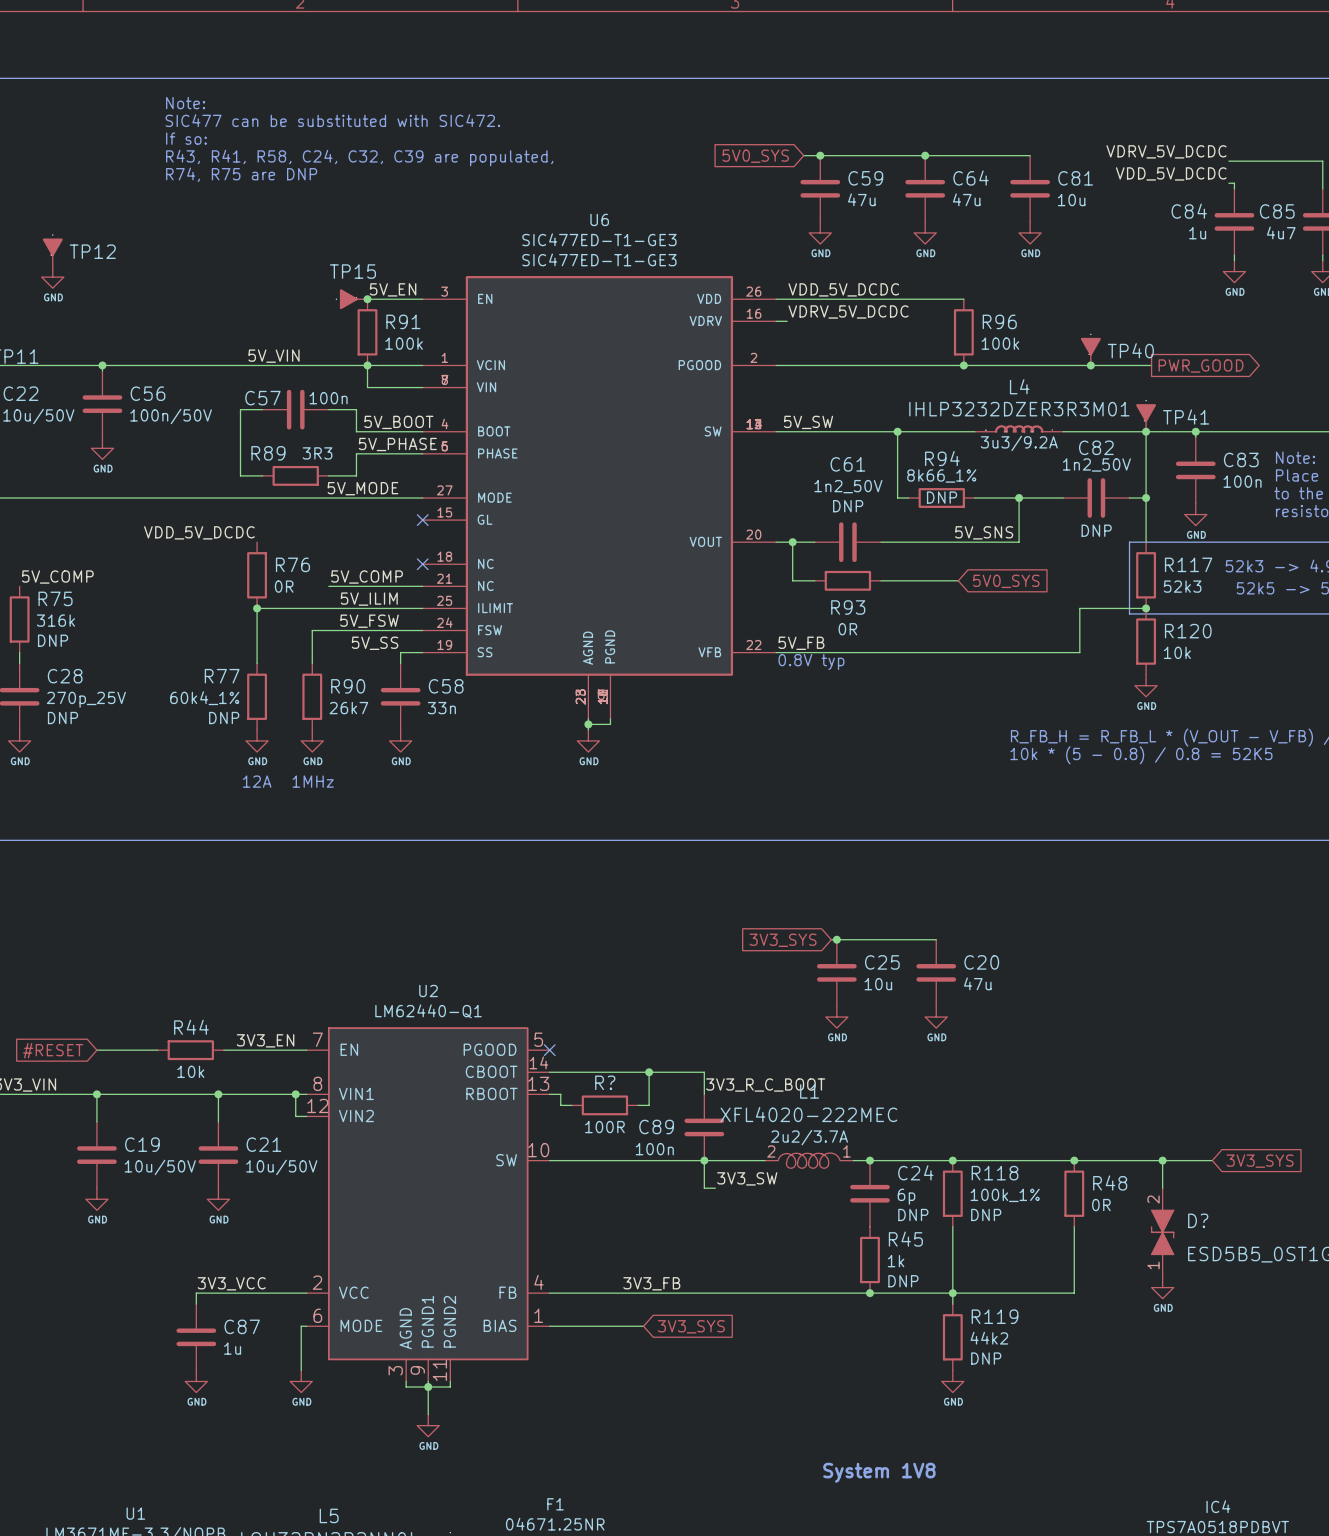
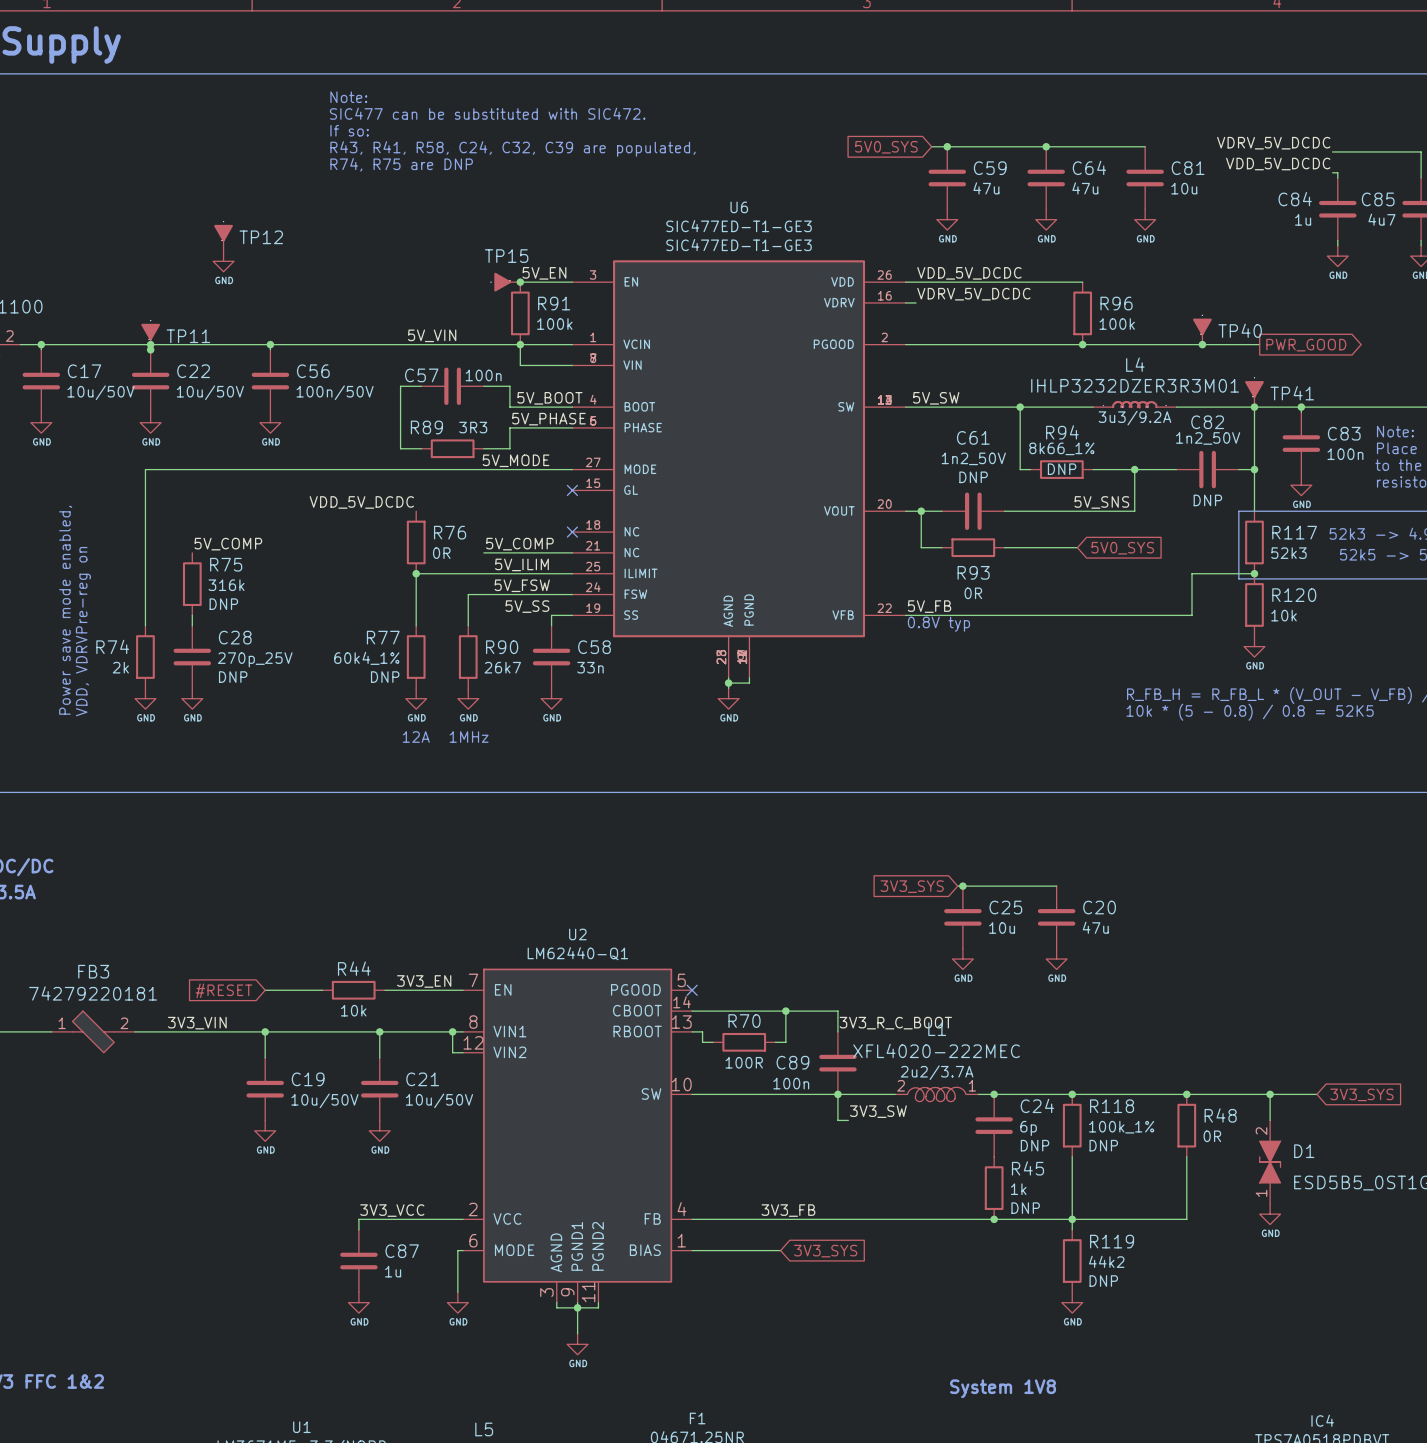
R? name: R? (605, 1082) -> R70 (744, 1021)
D? name: D? (1198, 1220) -> D1 (1304, 1151)

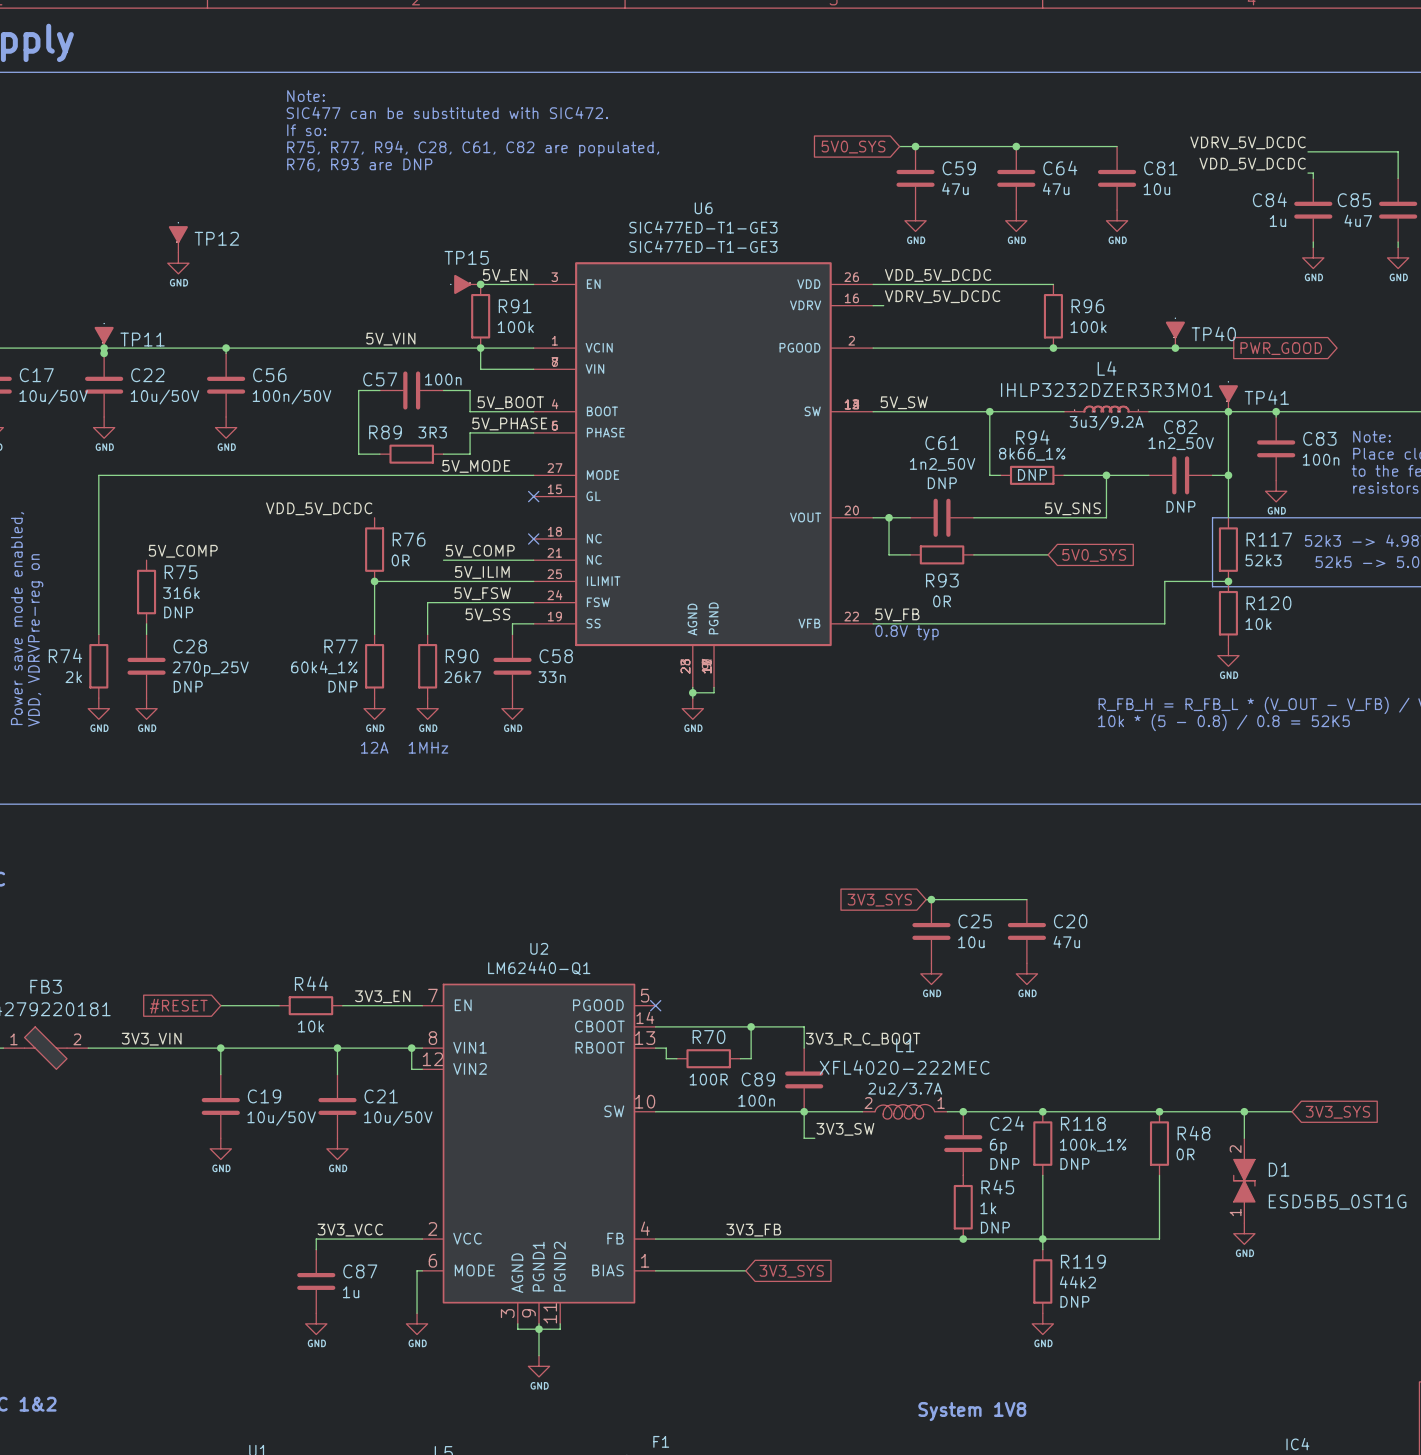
text: R43, R41, R58, C24, C32, C39 are populated, (512, 148) -> R75, R77, R94, C28, C61, C82 are populated, (473, 148)
text: R74, R75 are DNP (401, 164) -> R76, R93 are DNP (359, 165)

